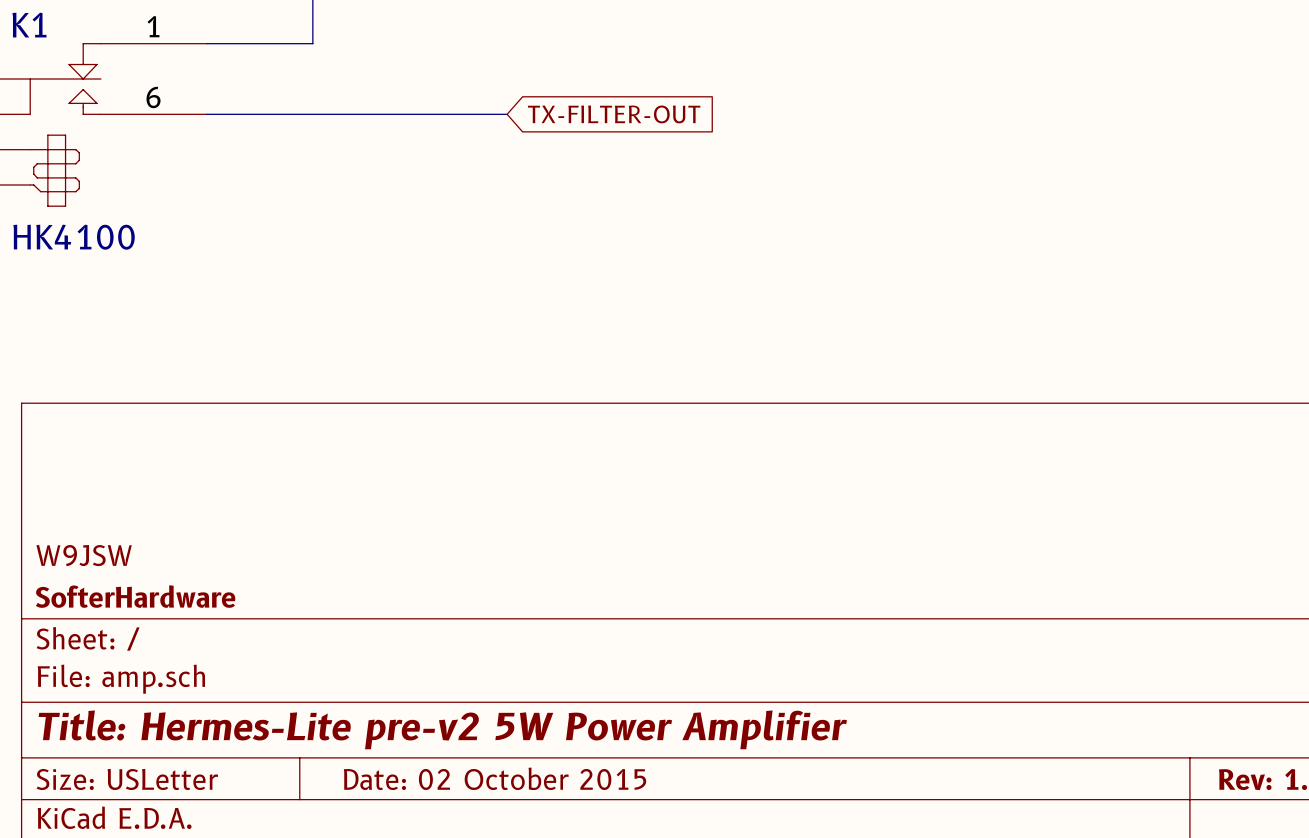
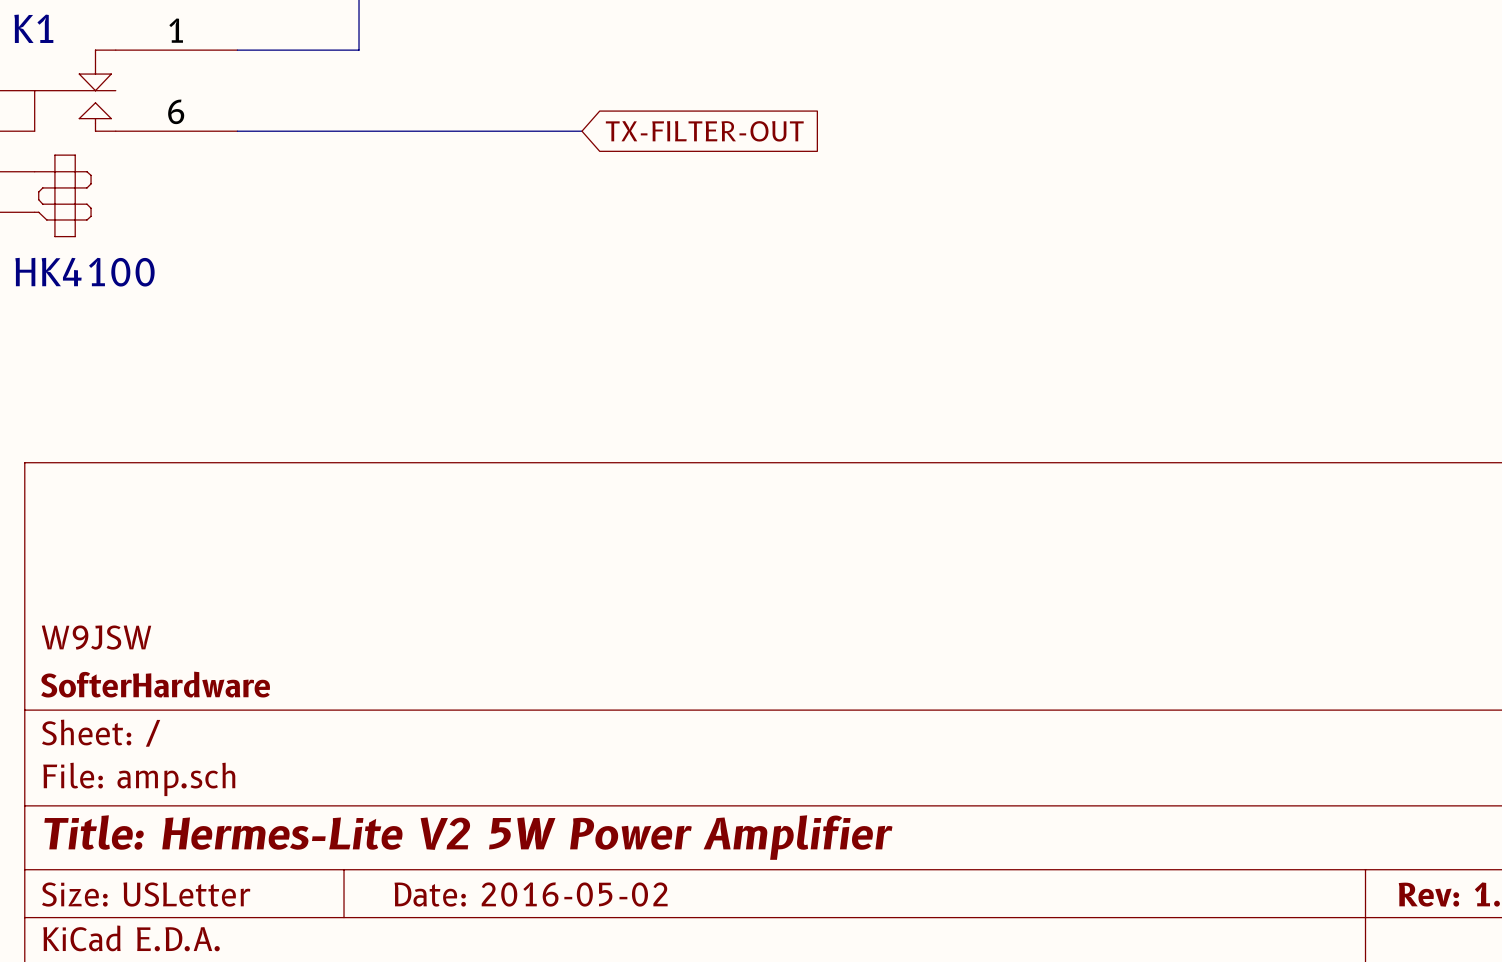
title block: Title: Hermes-Lite pre-v2 5W Power Amplifier (442, 729) -> Title: Hermes-Lite V2 5W Power Amplifier (468, 837)
title block: Date: 02 October 2015 (495, 778) -> Date: 2016-05-02 (531, 894)

